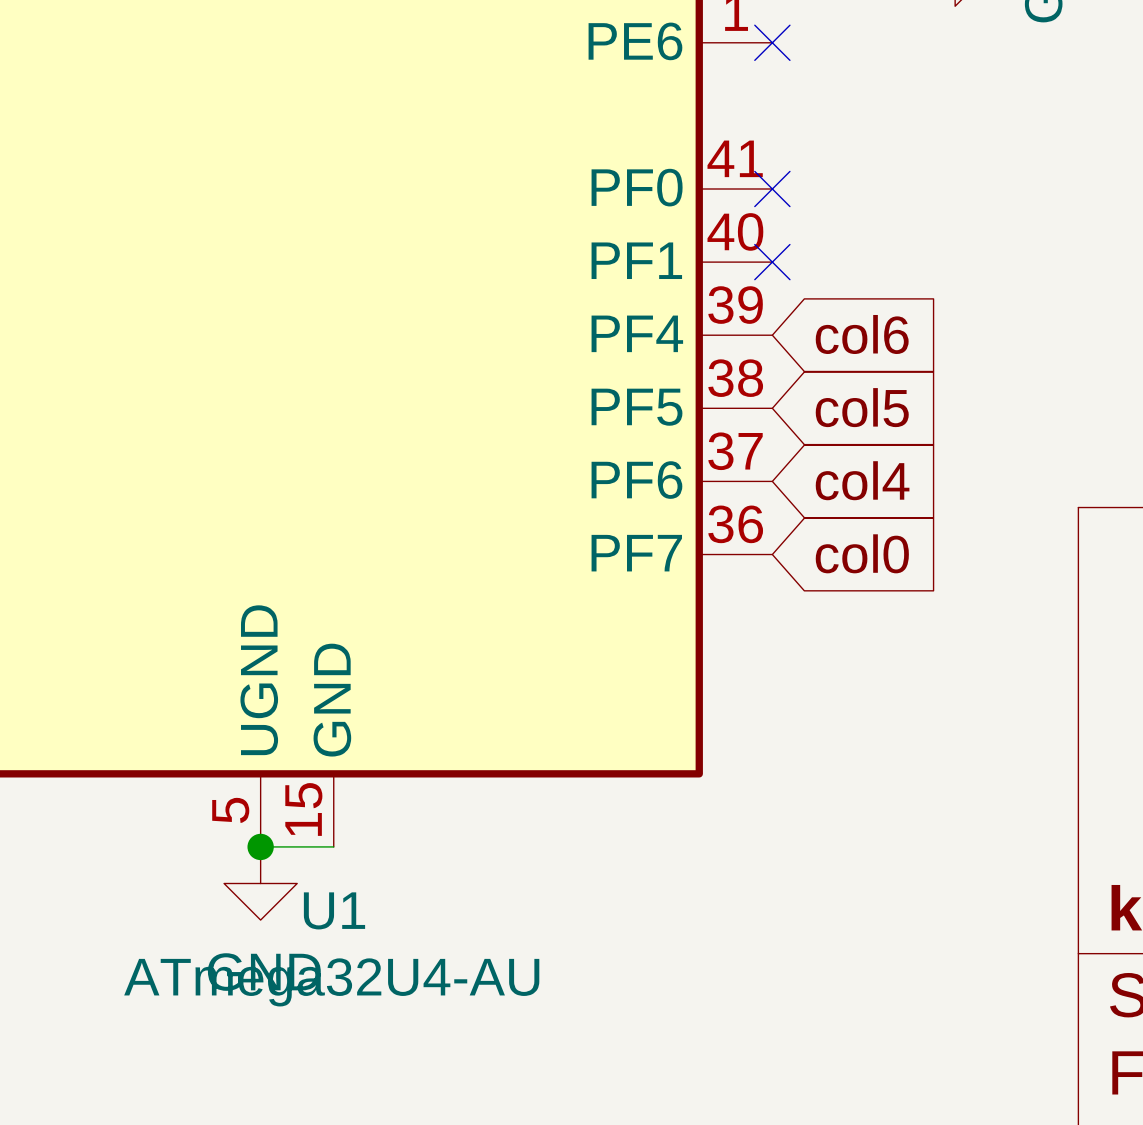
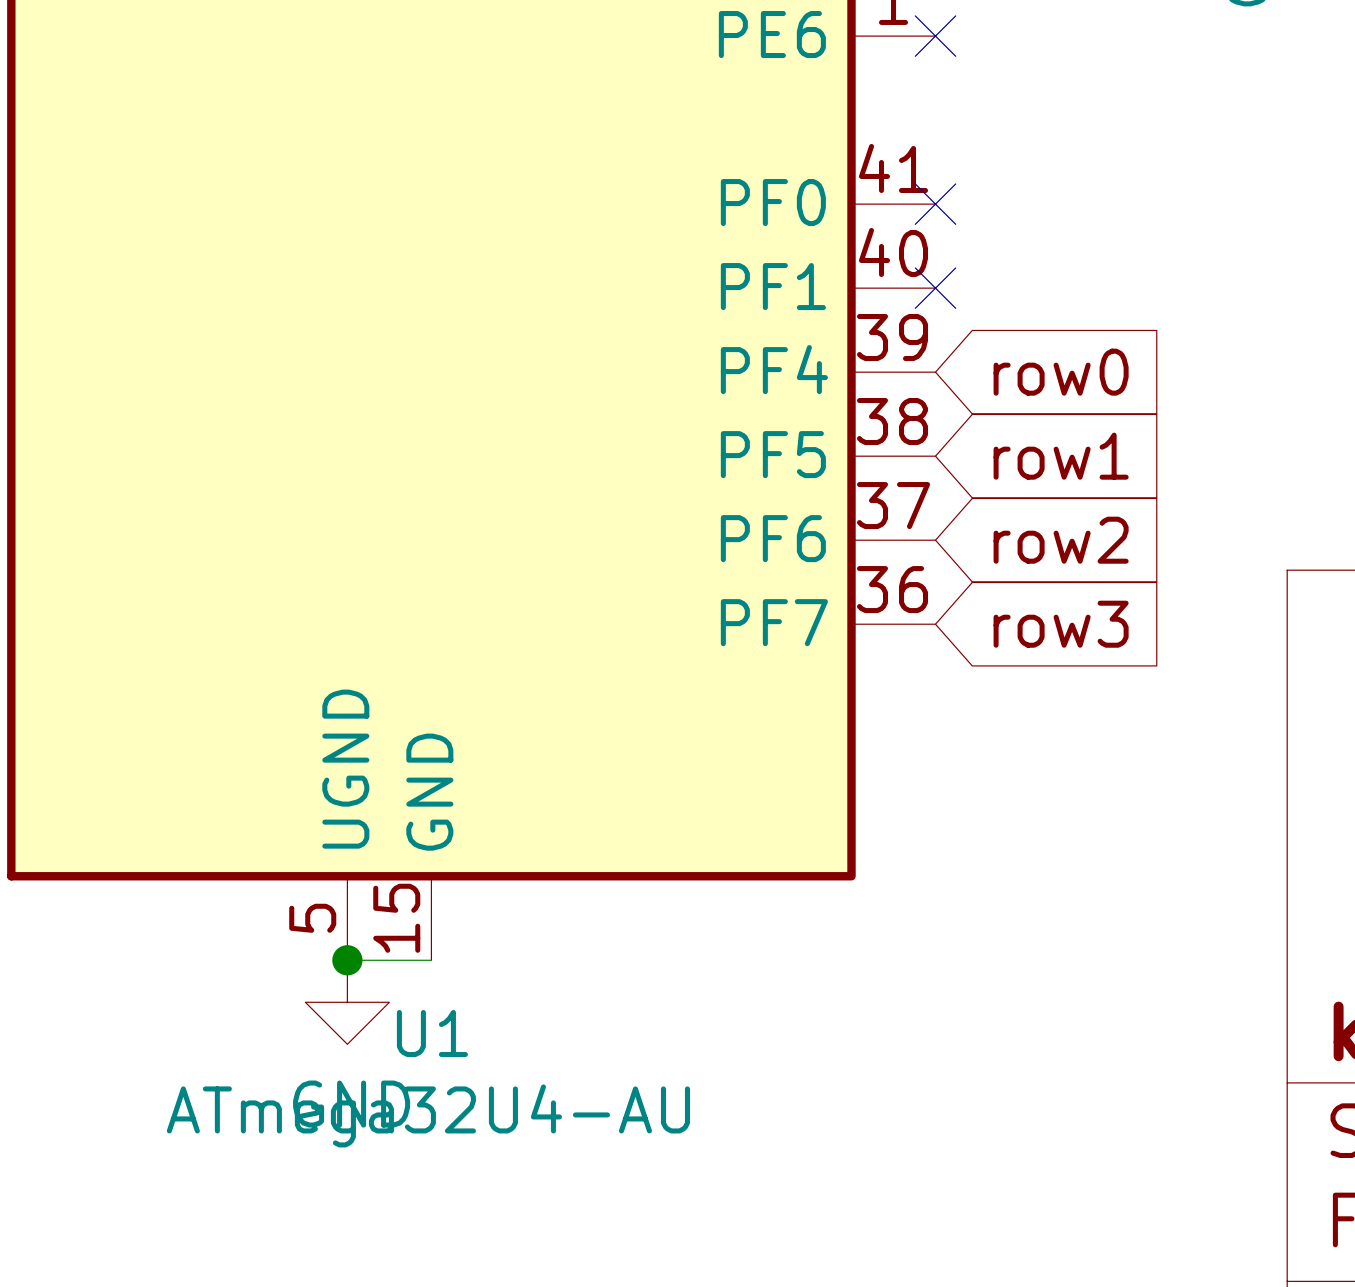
global label: col6 (862, 334) -> row0 (1061, 372)
global label: col5 (862, 407) -> row1 (1061, 456)
global label: col4 (862, 480) -> row2 (1061, 540)
global label: col0 (862, 553) -> row3 (1061, 624)

